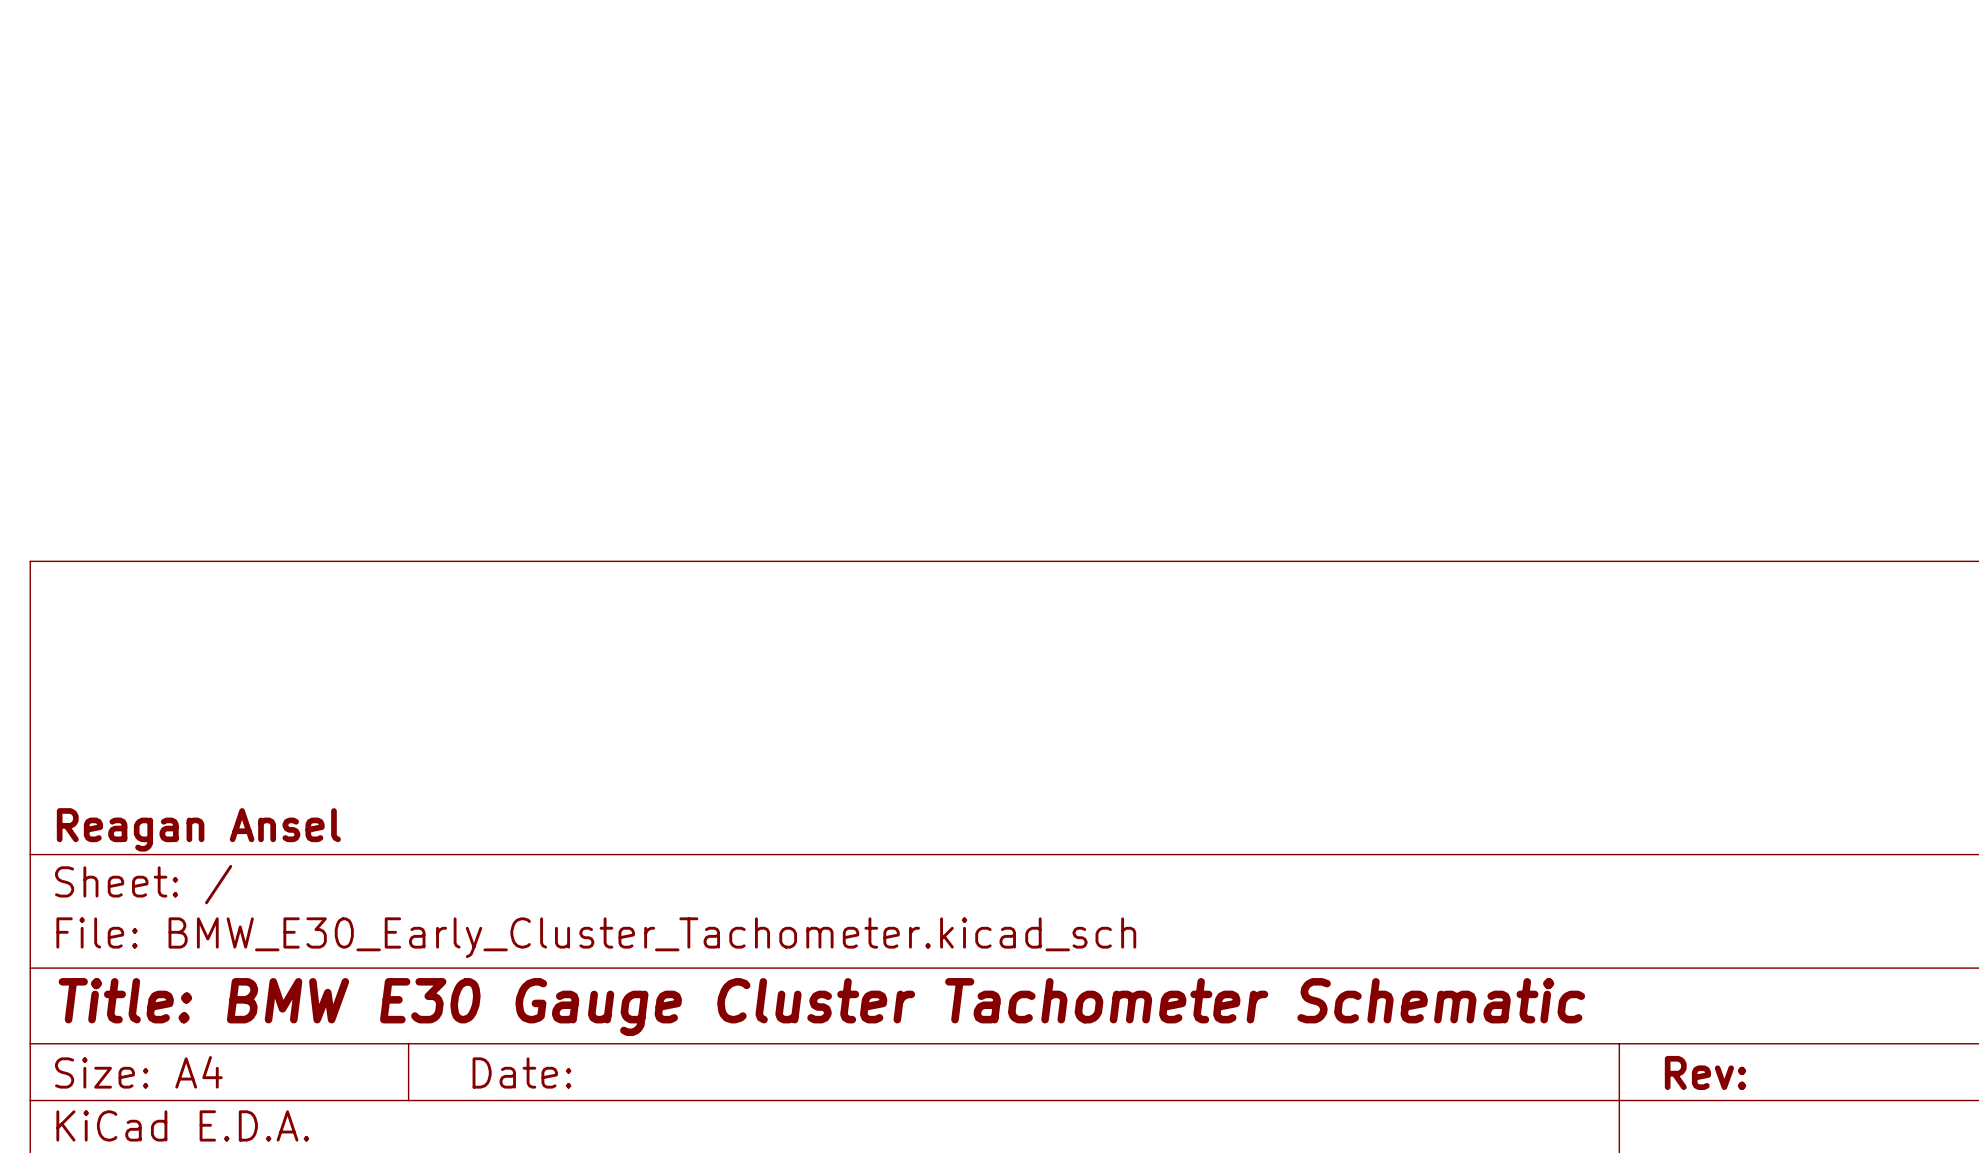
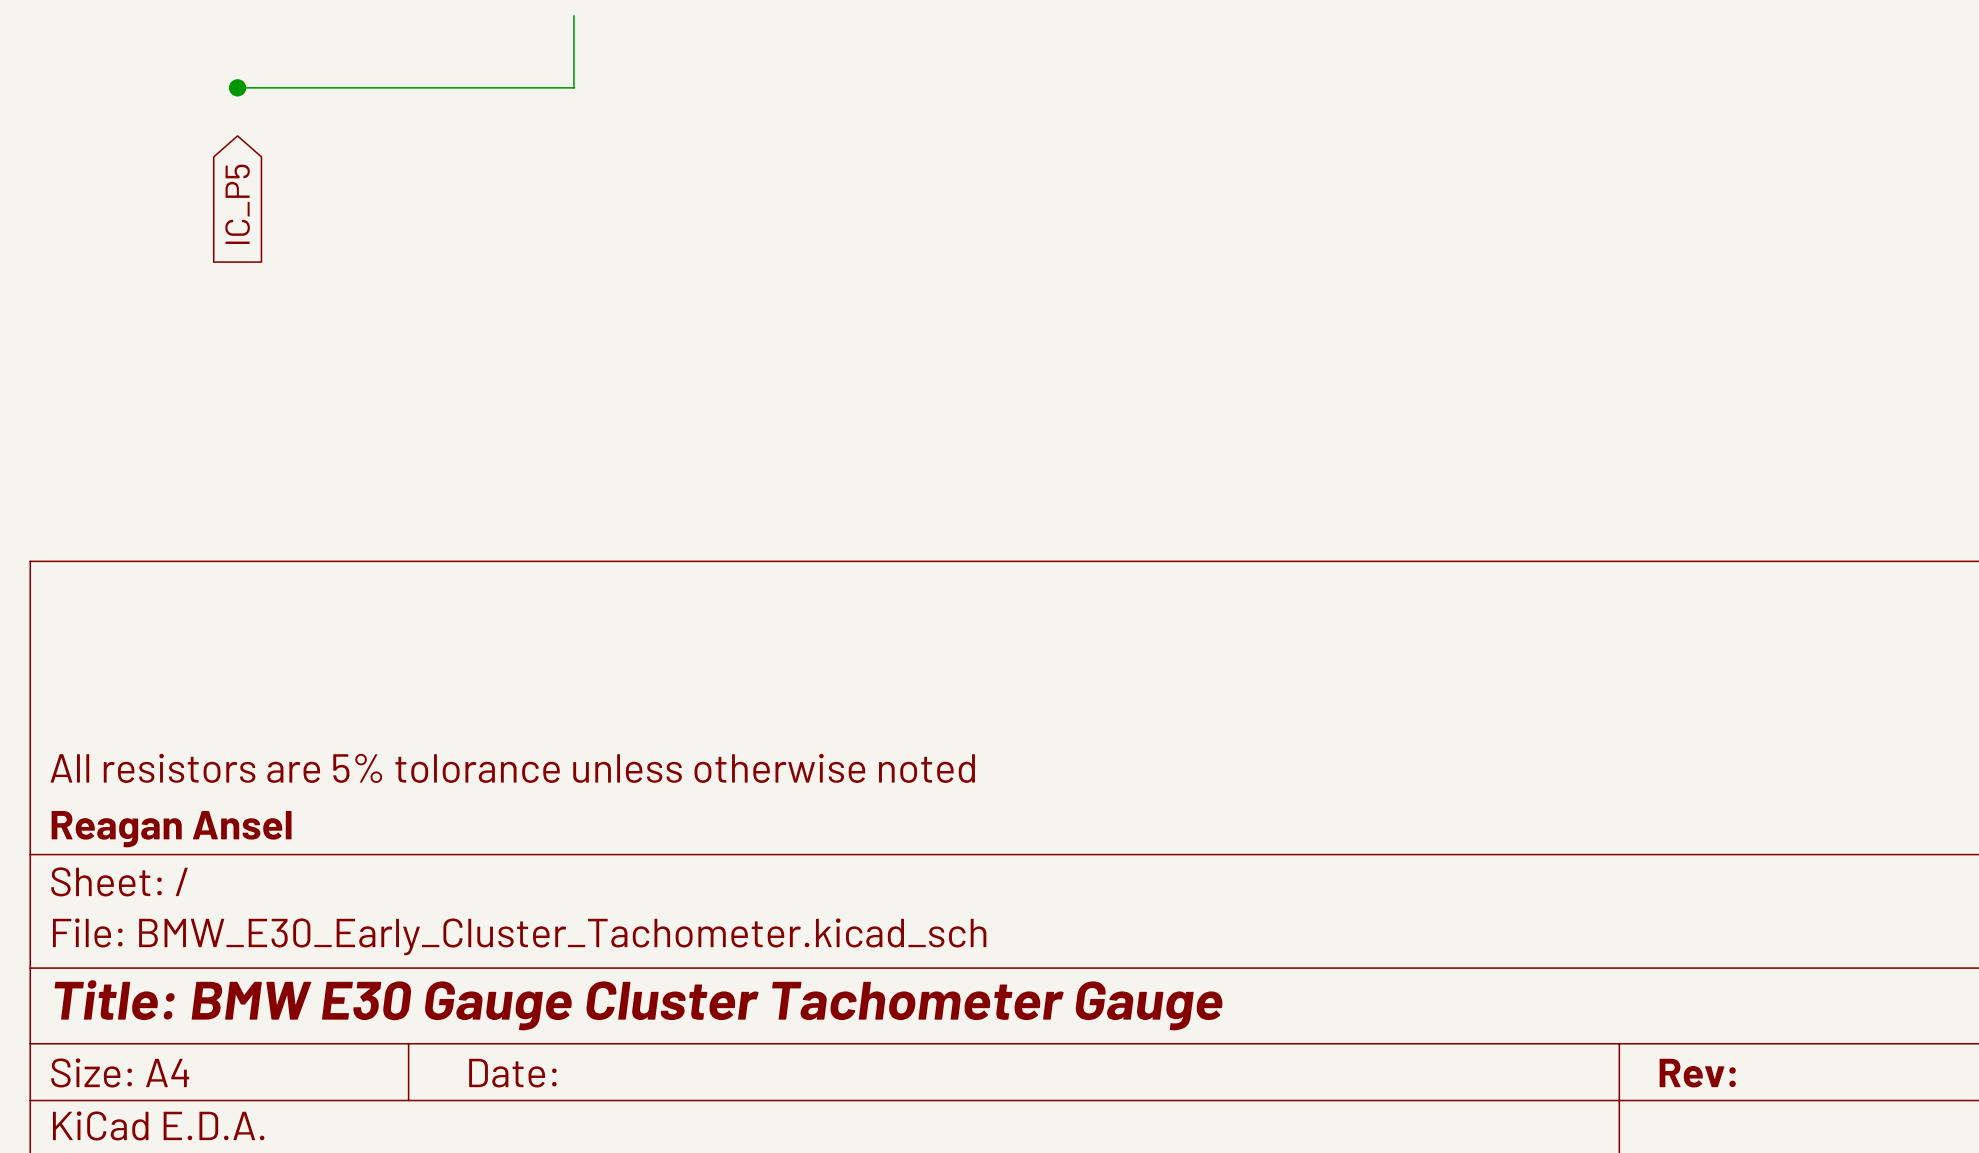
wire: none -> (573, 15) (573, 87) (237, 87)
junction: none -> (237, 87)
global label: none -> IC_P5 (237, 204)
title block: none -> All resistors are 5% tolorance unless otherwise noted (512, 768)
title block: Title: BMW E30 Gauge Cluster Tachometer Schematic (821, 1007) -> Title: BMW E30 Gauge Cluster Tachometer Gauge (638, 1005)

